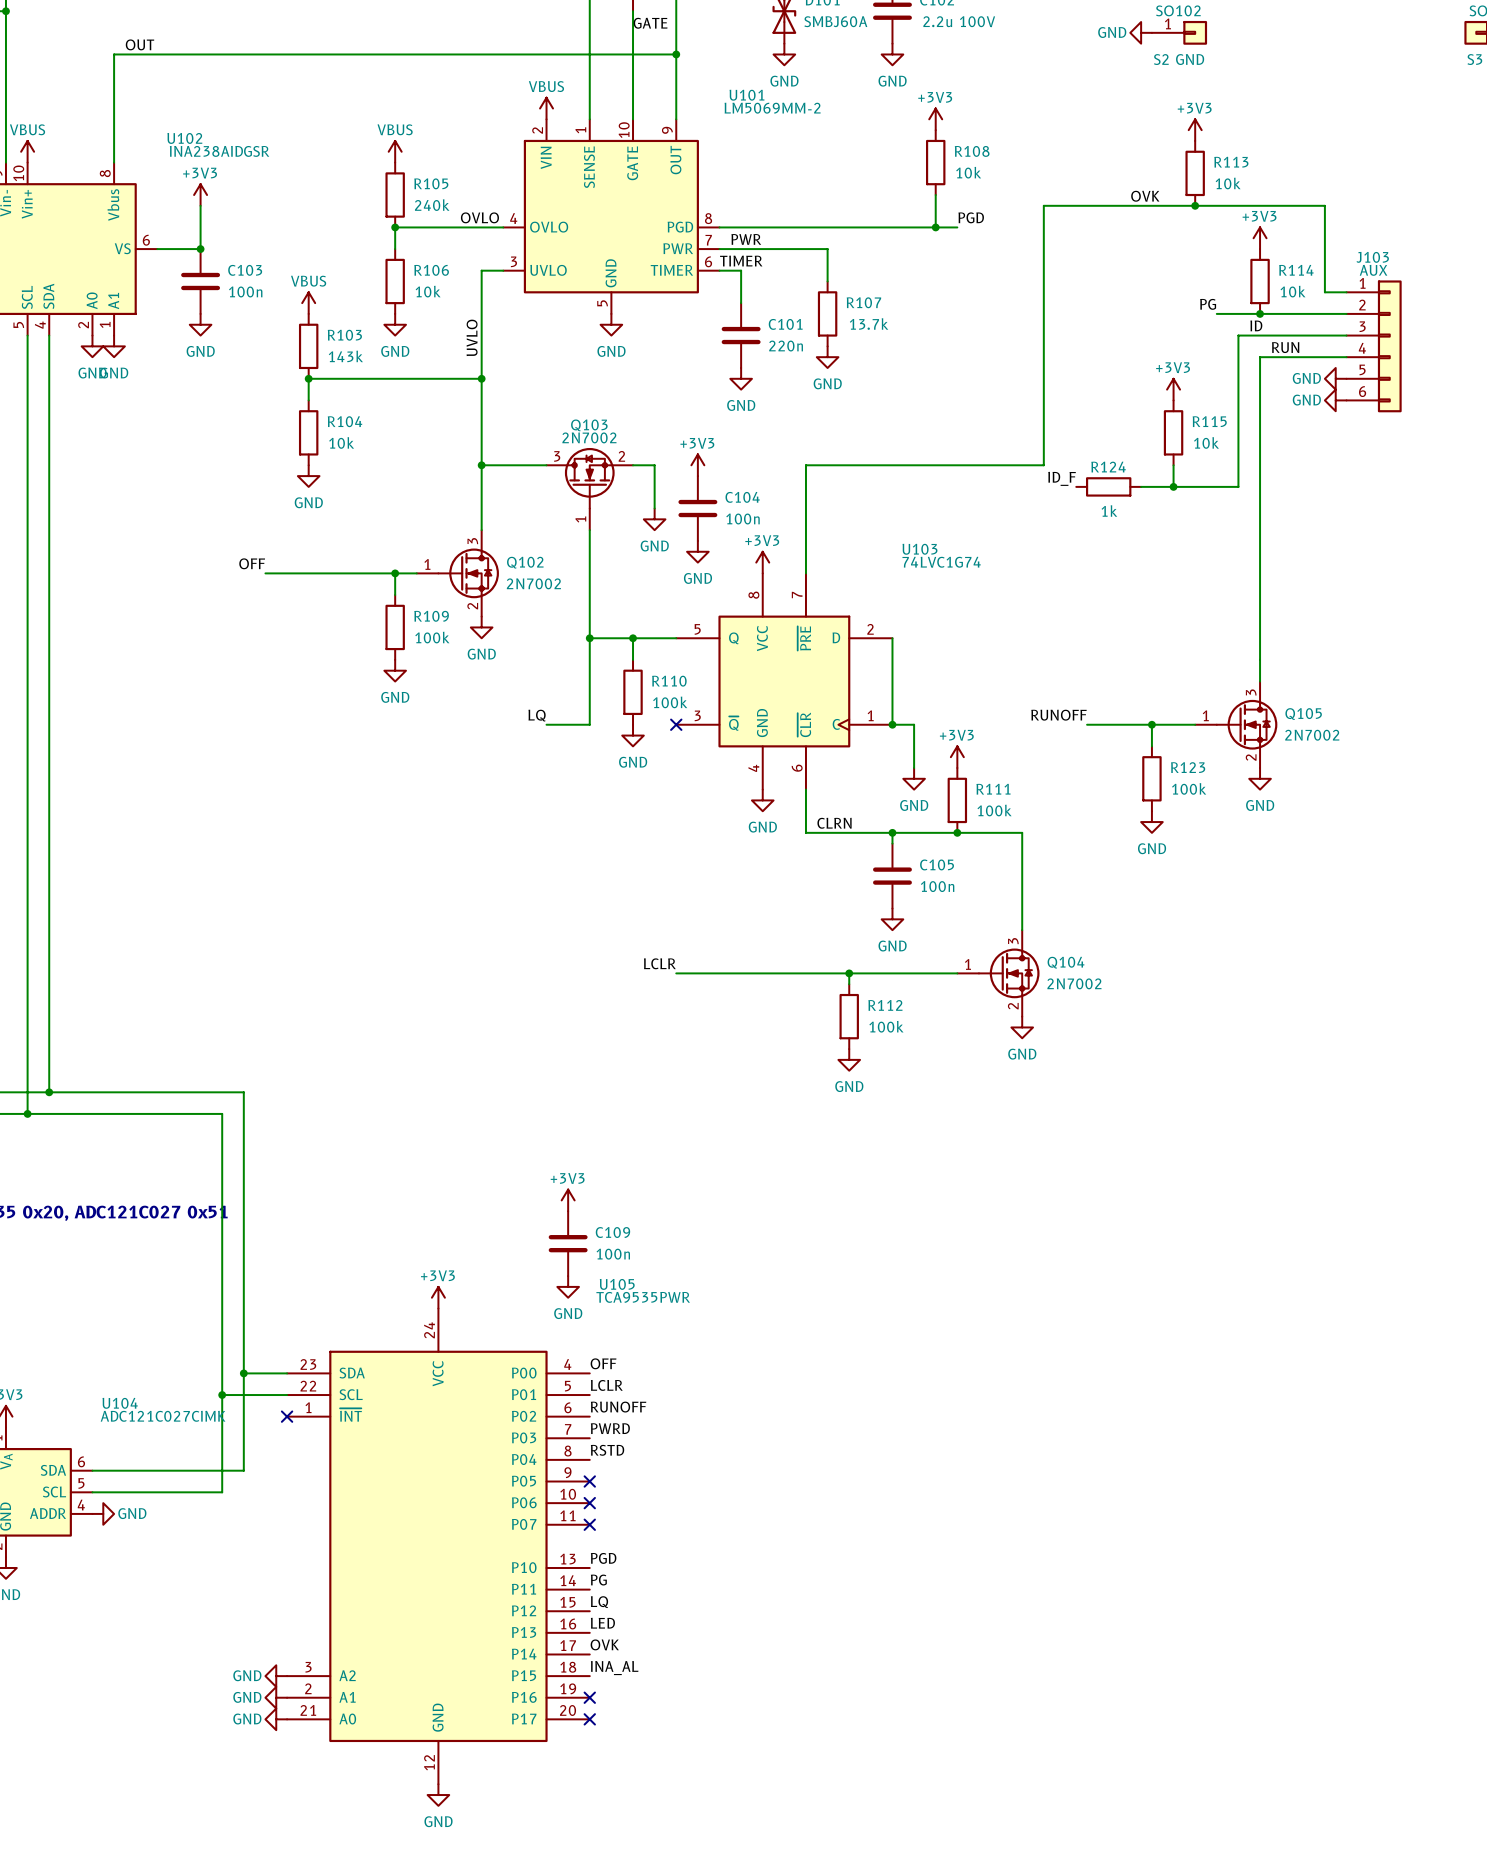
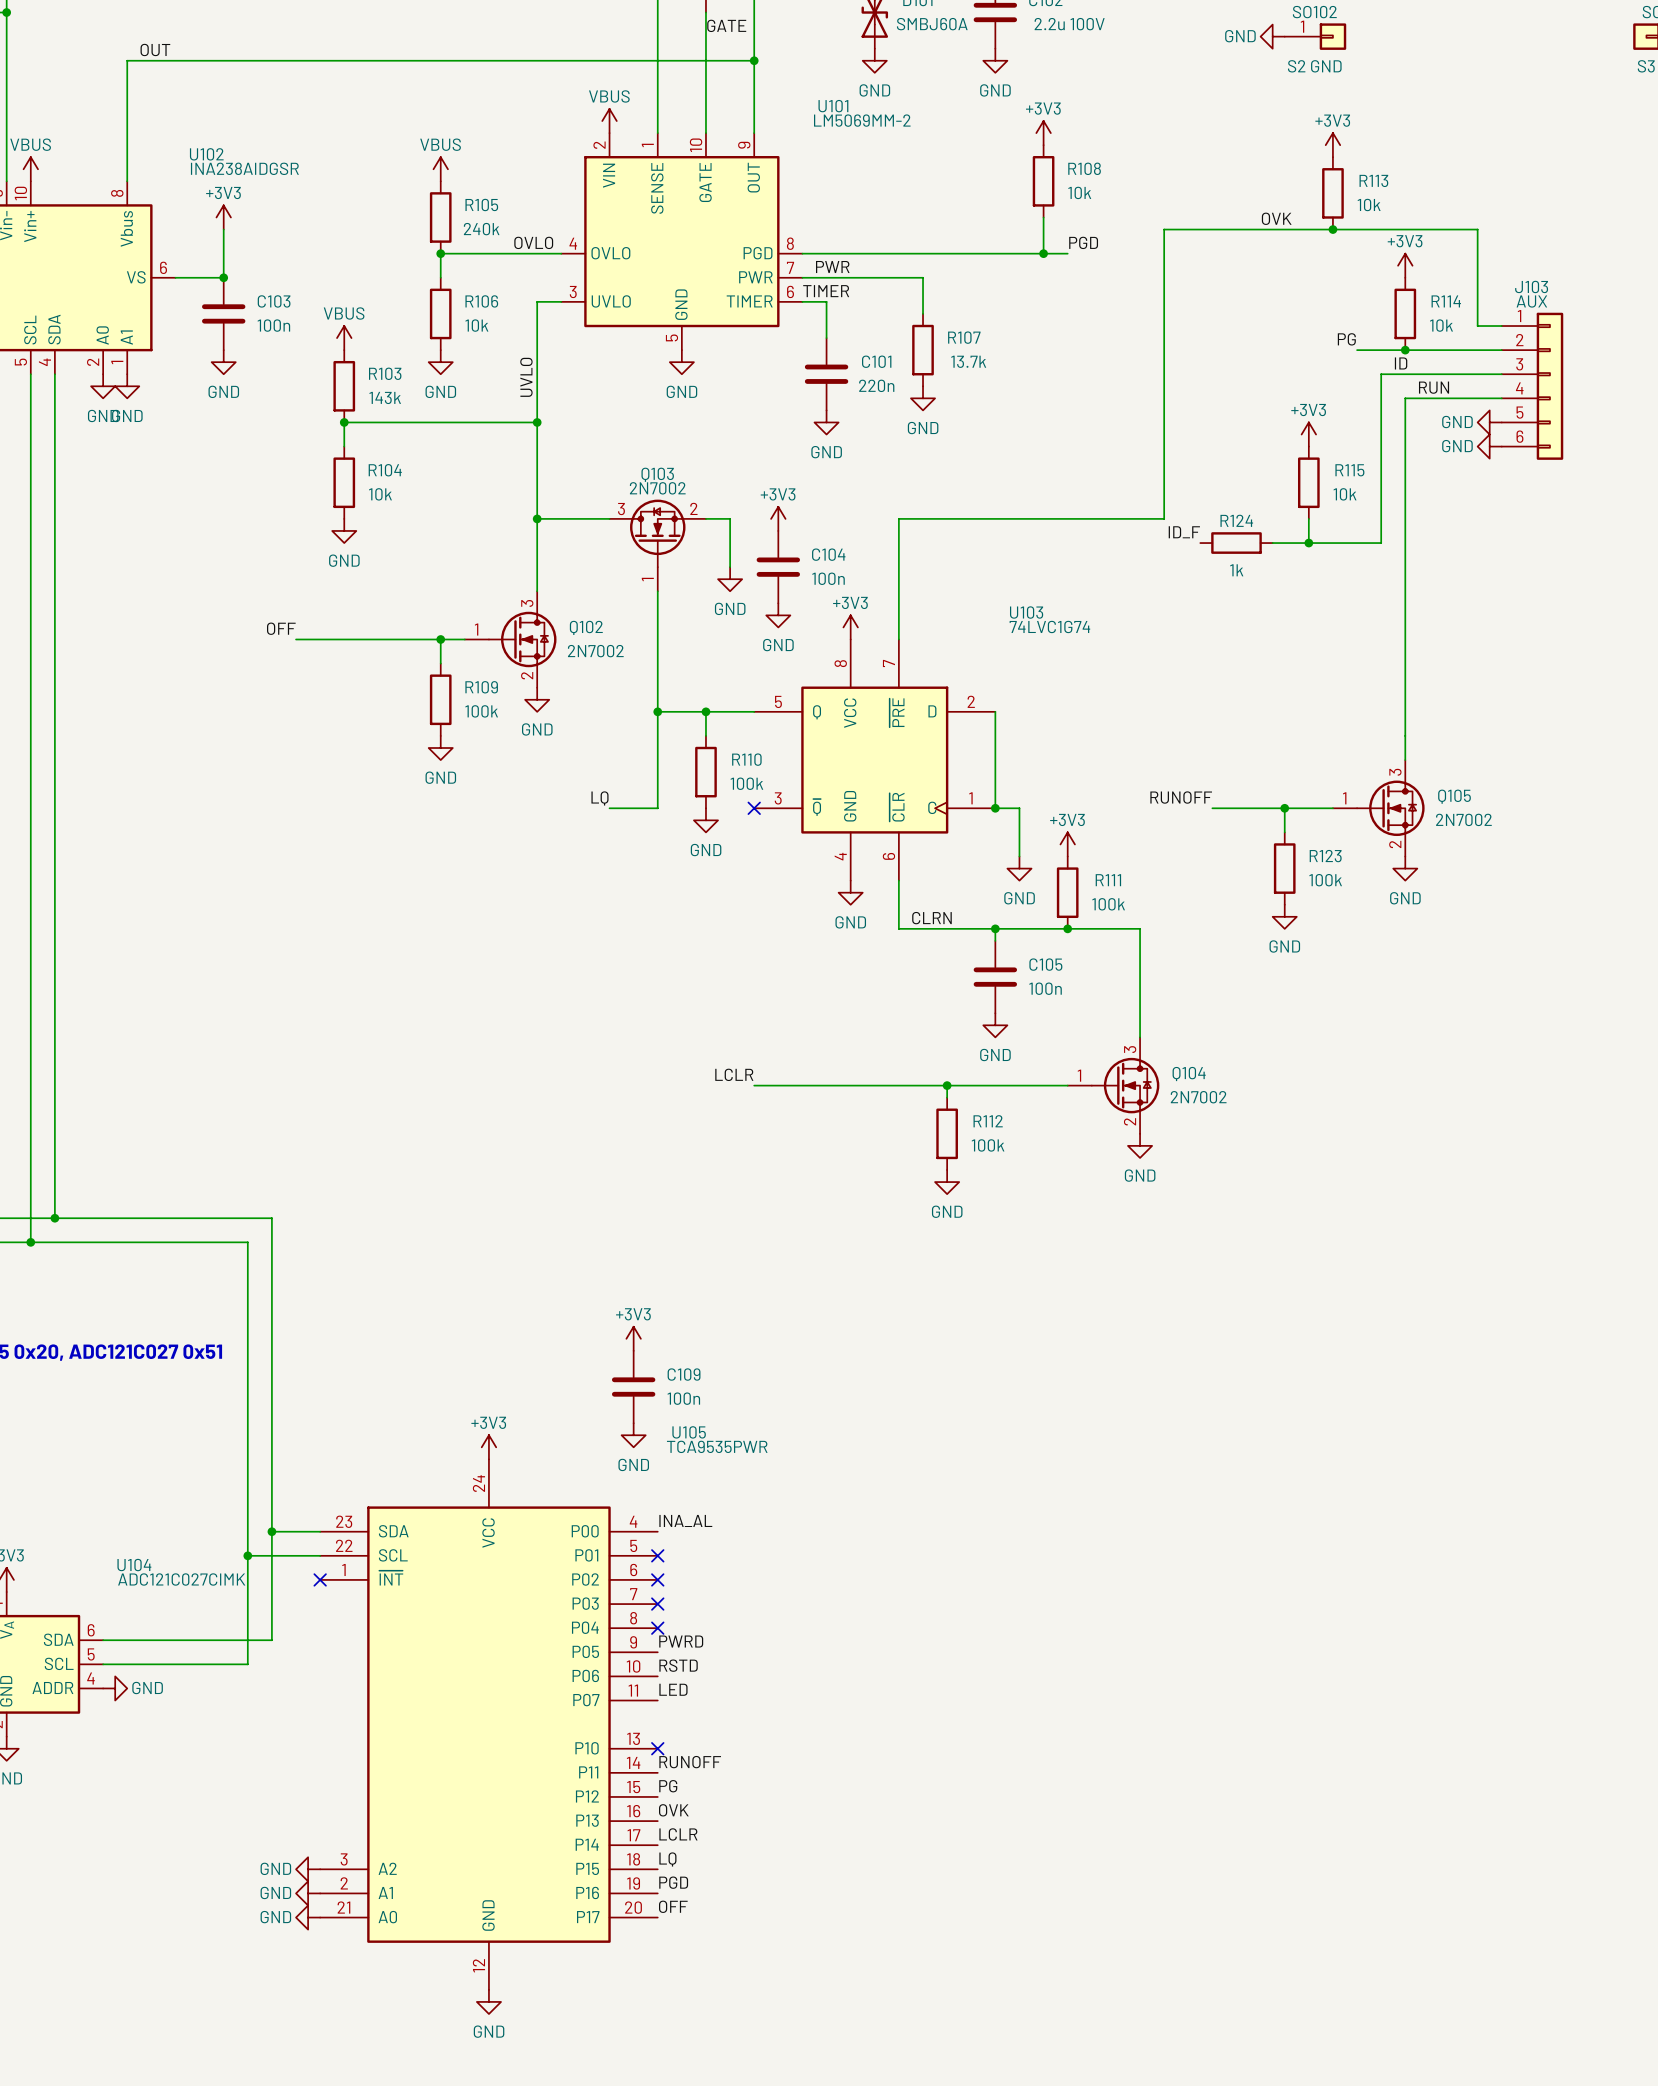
label: OFF (603, 1363) -> INA_AL (685, 1520)
label: LCLR (606, 1385) -> none
no-connect mark: none -> (657, 1555)
label: RUNOFF (618, 1407) -> none
no-connect mark: none -> (657, 1579)
label position: PWRD (610, 1428) -> PWRD (681, 1641)
no-connect mark: none -> (657, 1604)
label position: RSTD (607, 1450) -> RSTD (678, 1665)
no-connect mark: none -> (657, 1628)
no-connect mark: (589, 1481) -> none
no-connect mark: (589, 1503) -> none
label: none -> LED (673, 1689)
no-connect mark: (589, 1524) -> none
label position: PGD (603, 1558) -> PGD (673, 1882)
no-connect mark: none -> (657, 1748)
label: PG (598, 1580) -> RUNOFF (690, 1762)
label: LQ (599, 1602) -> PG (668, 1786)
label: LED (602, 1623) -> OVK (673, 1810)
label: OVK (604, 1644) -> LCLR (678, 1834)
label: INA_AL (614, 1668) -> LQ (667, 1859)
no-connect mark: (589, 1697) -> none
label: none -> OFF (673, 1906)
no-connect mark: (589, 1719) -> none

